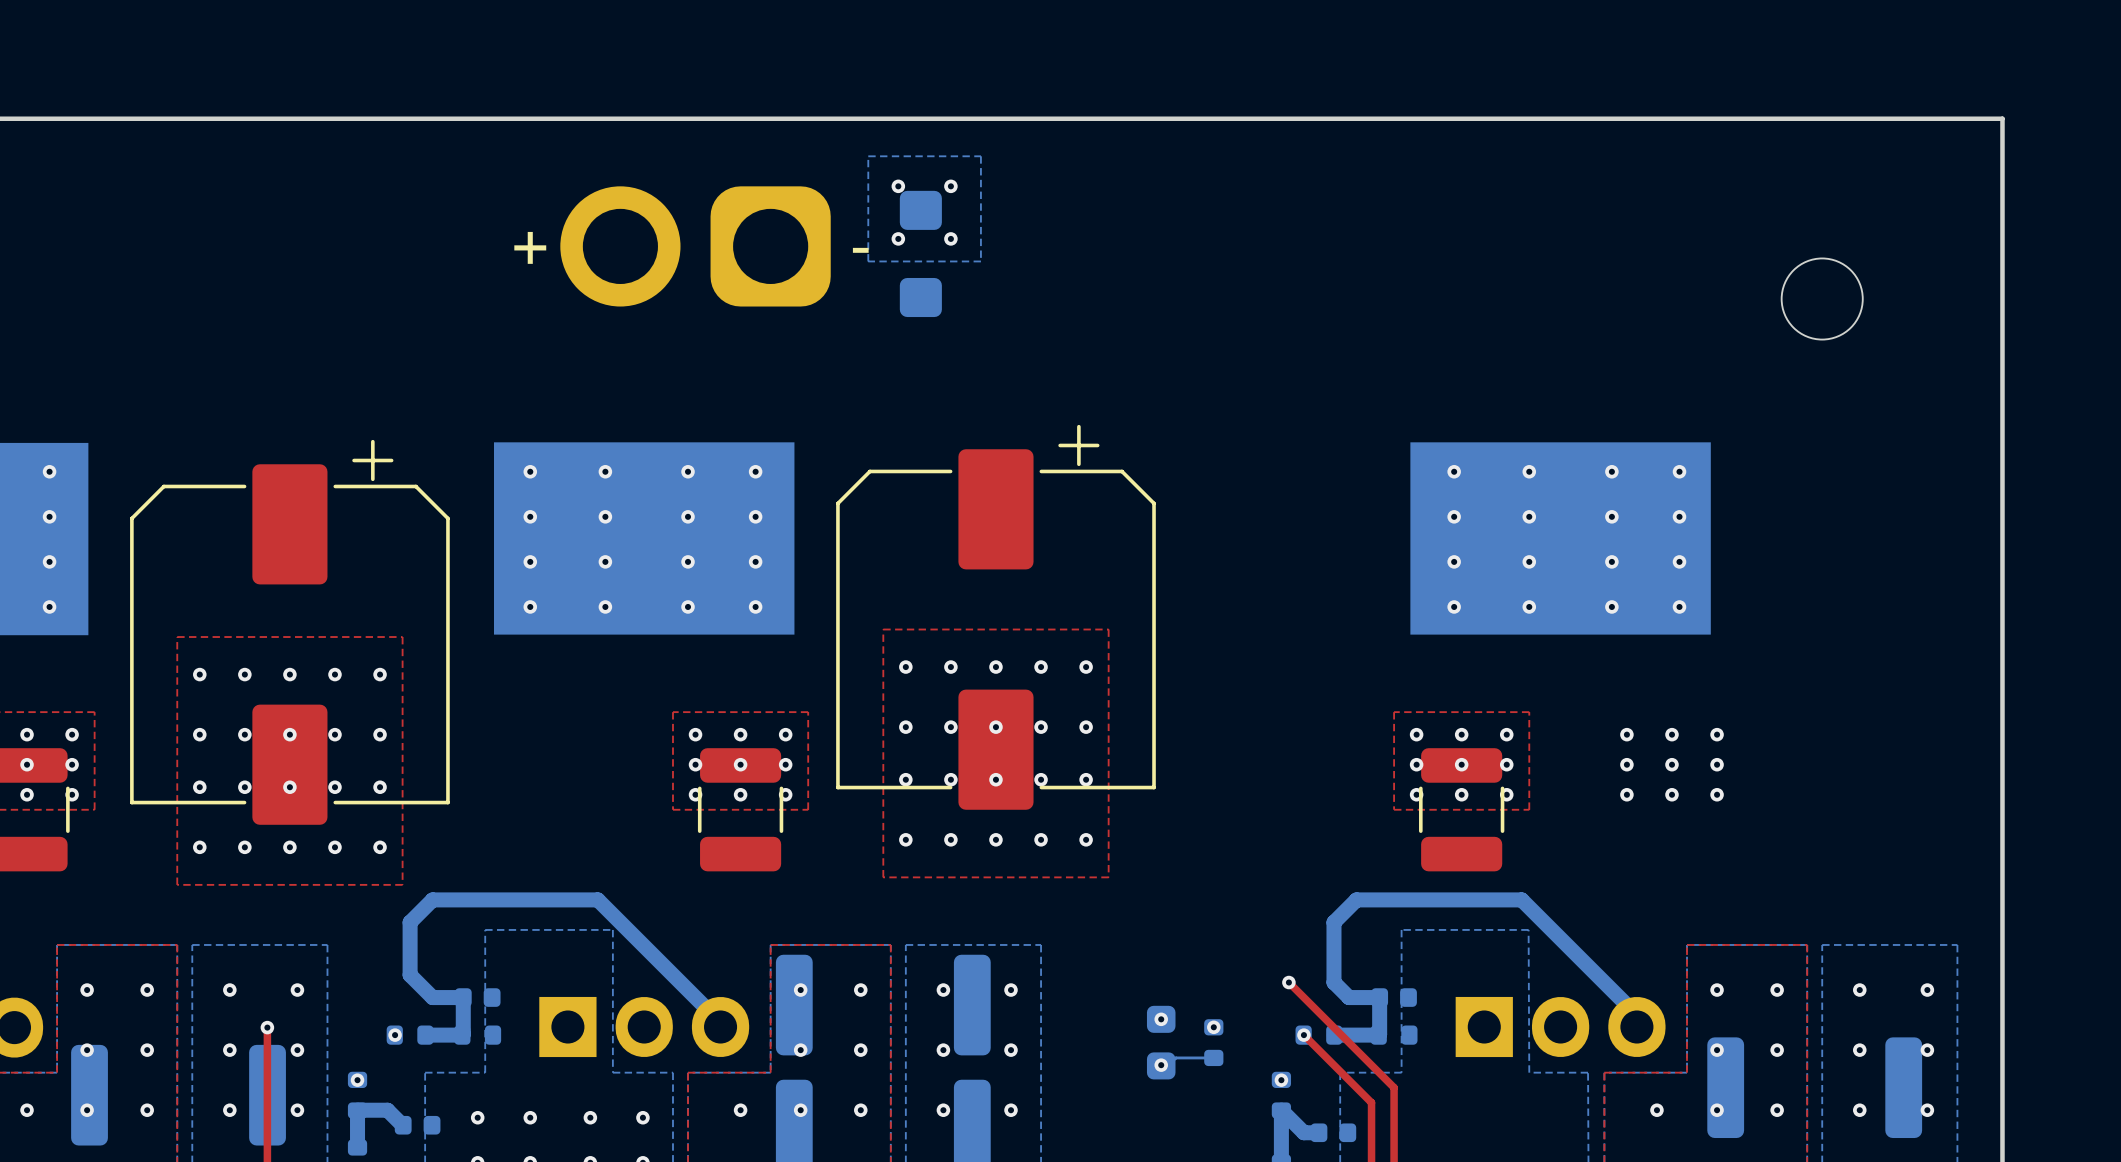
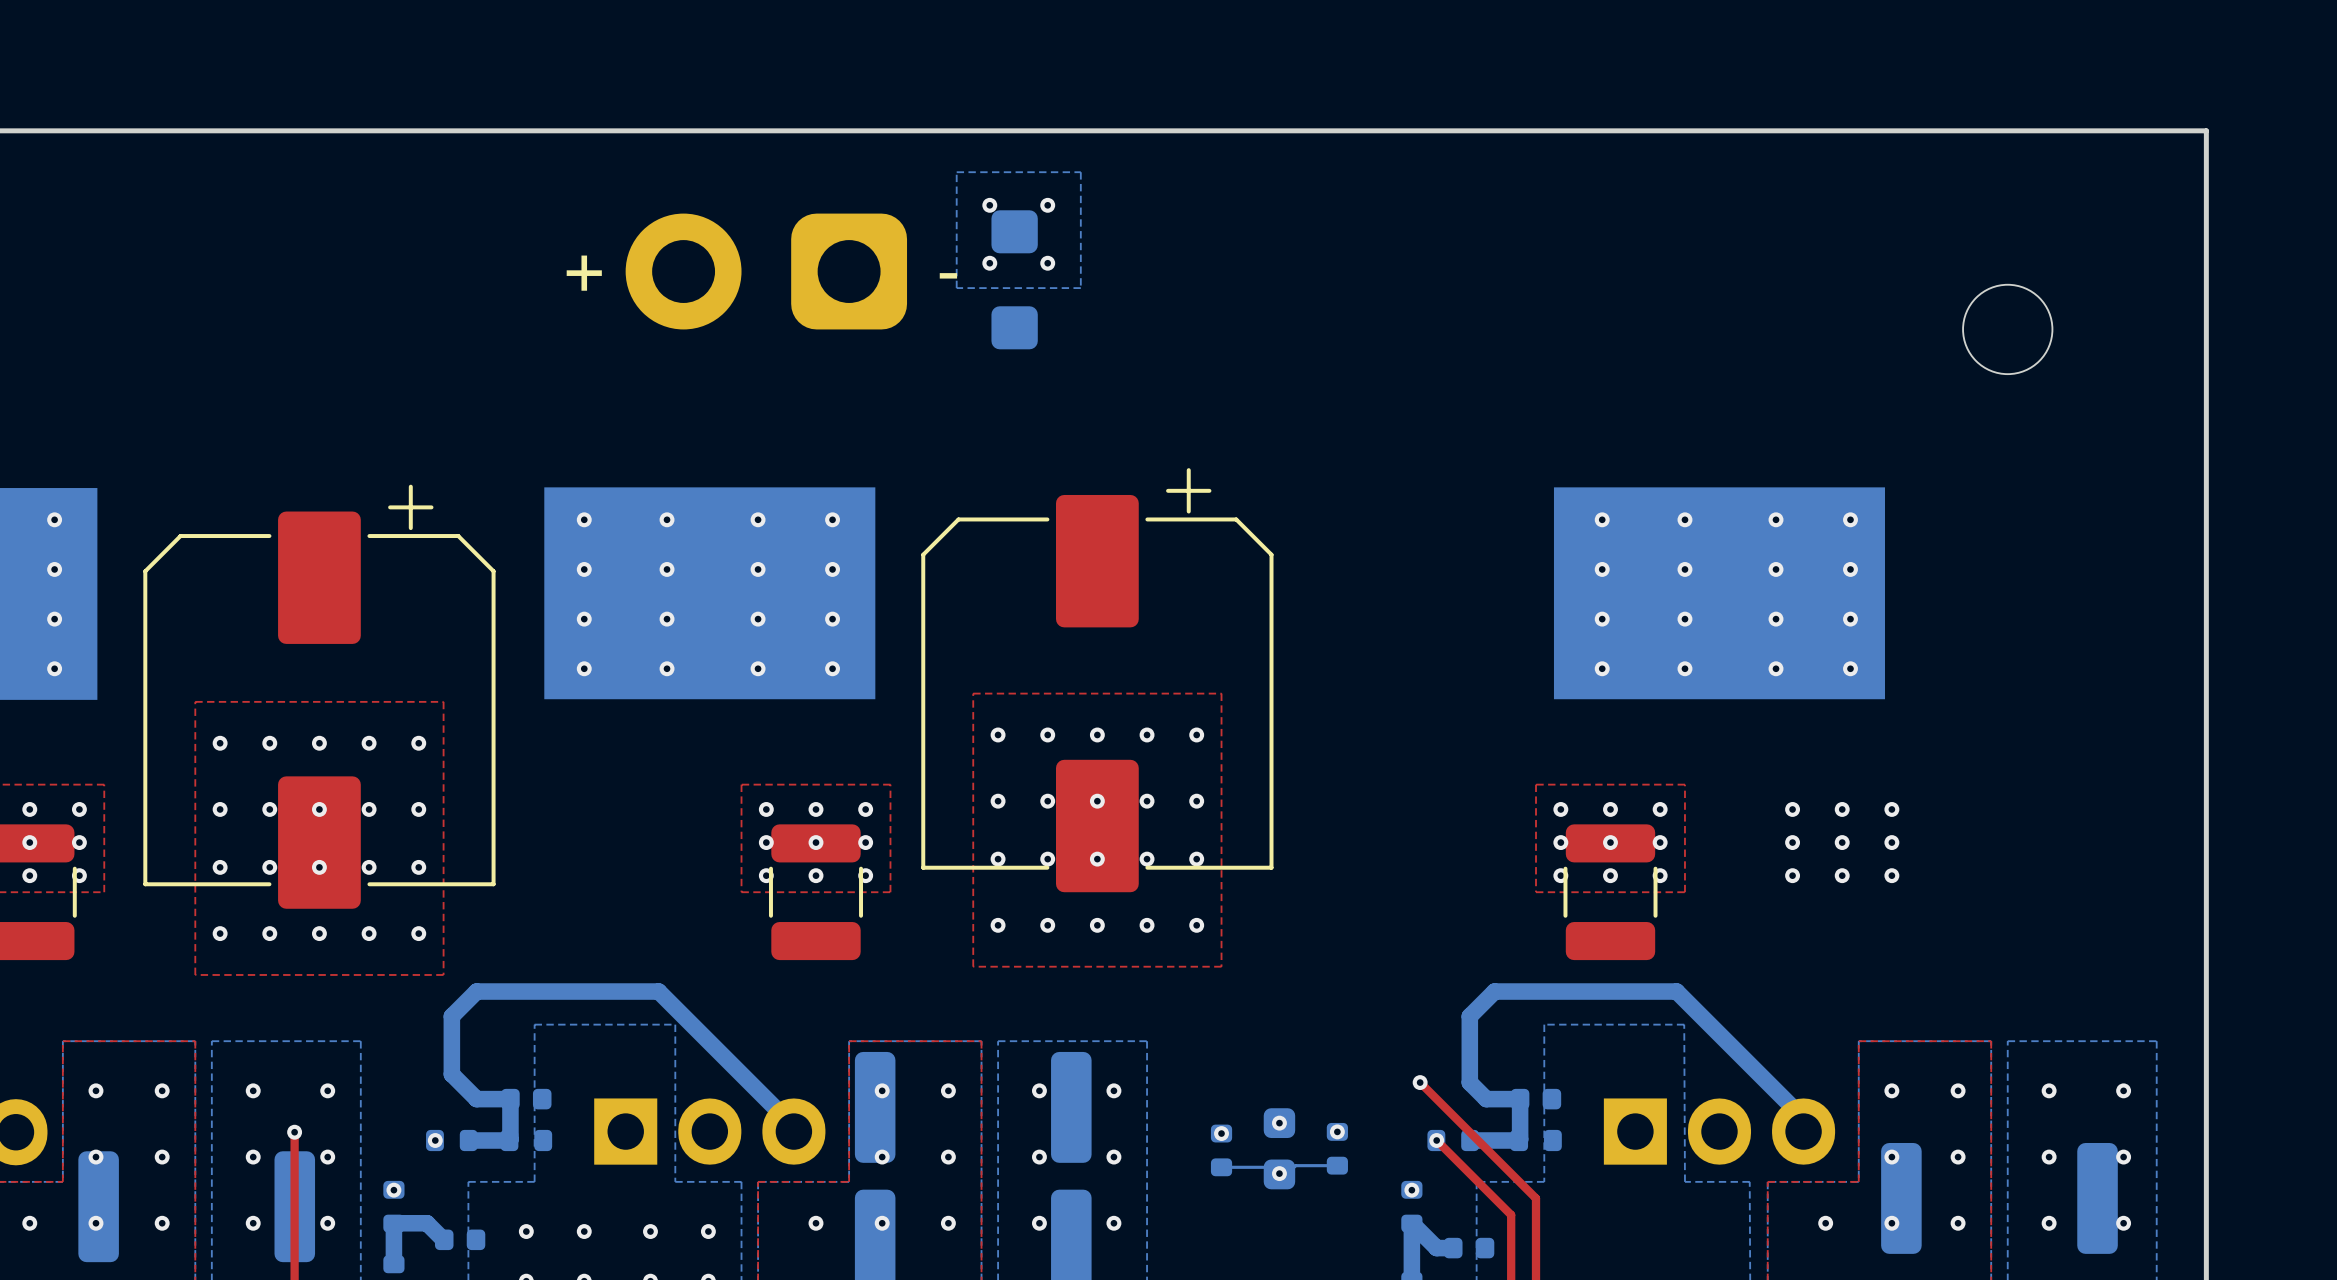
part footprint: [560, 186, 831, 307] -> [625, 213, 908, 330]
via: none -> (1221, 1133)
part: none -> (1221, 1150)
bottom track: none -> (1221, 1167) (1272, 1167)

